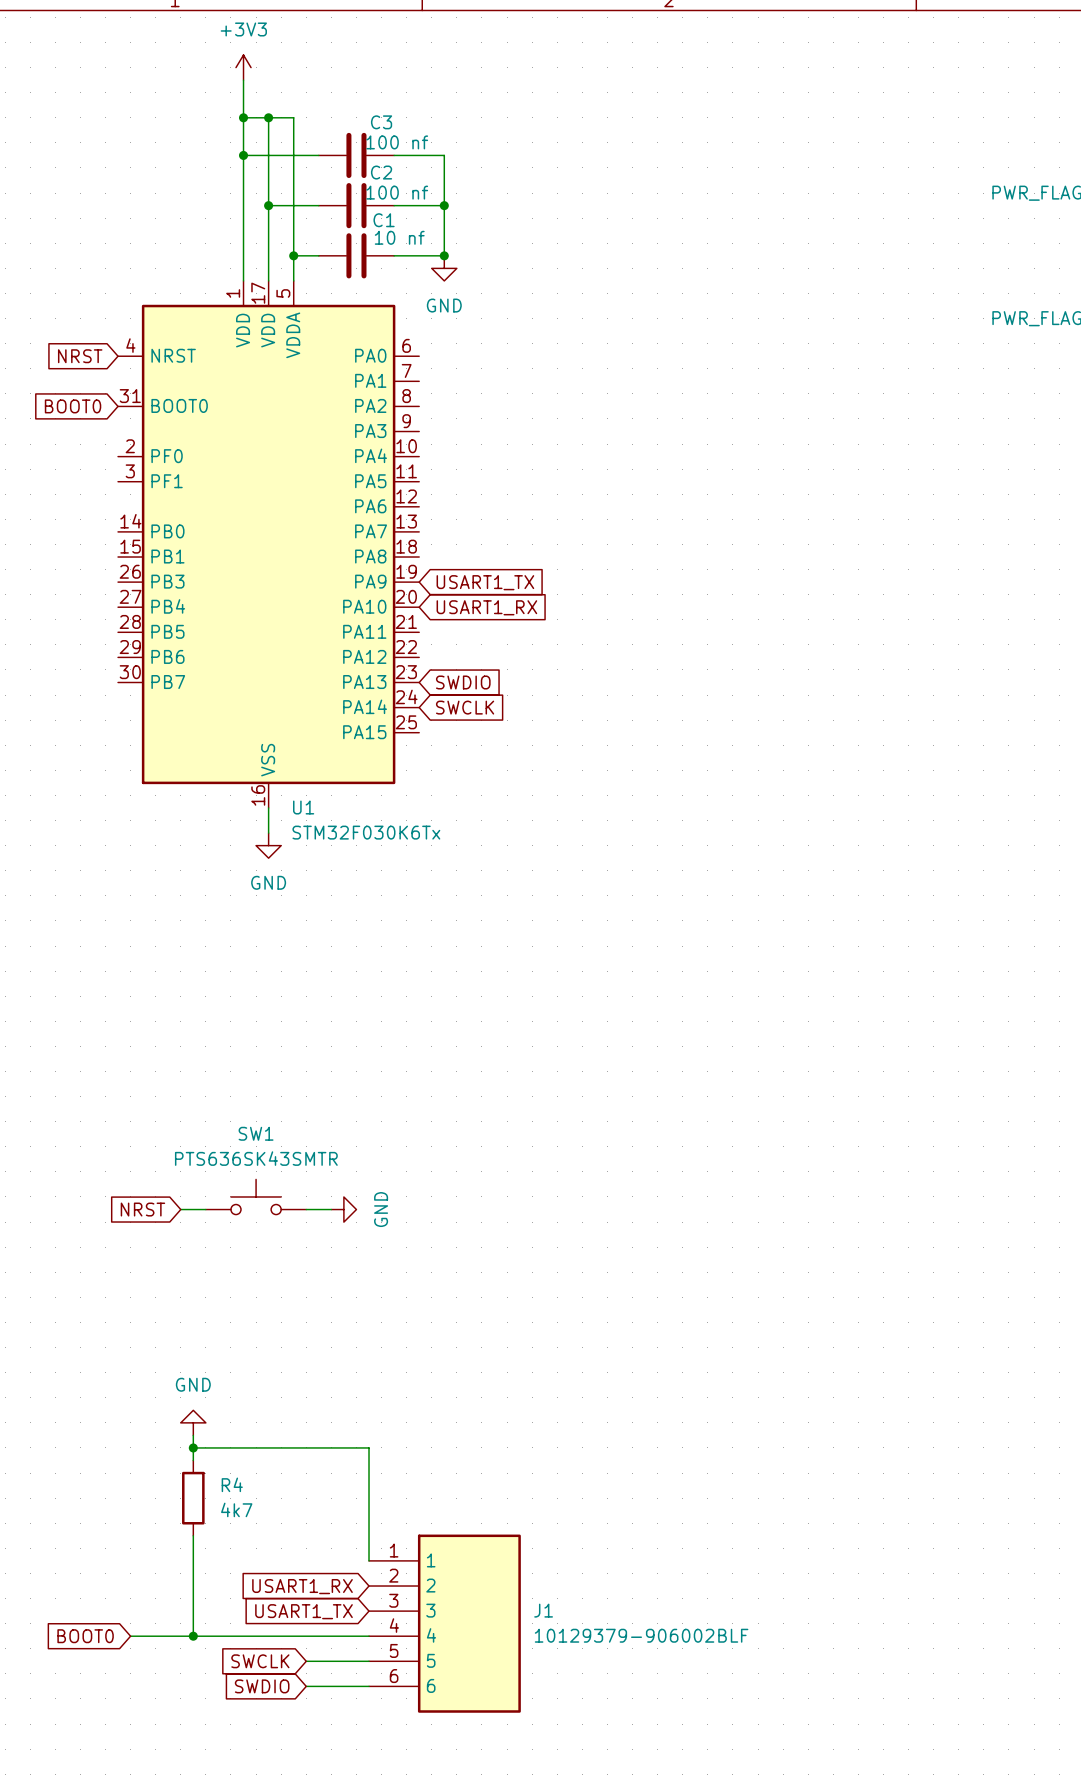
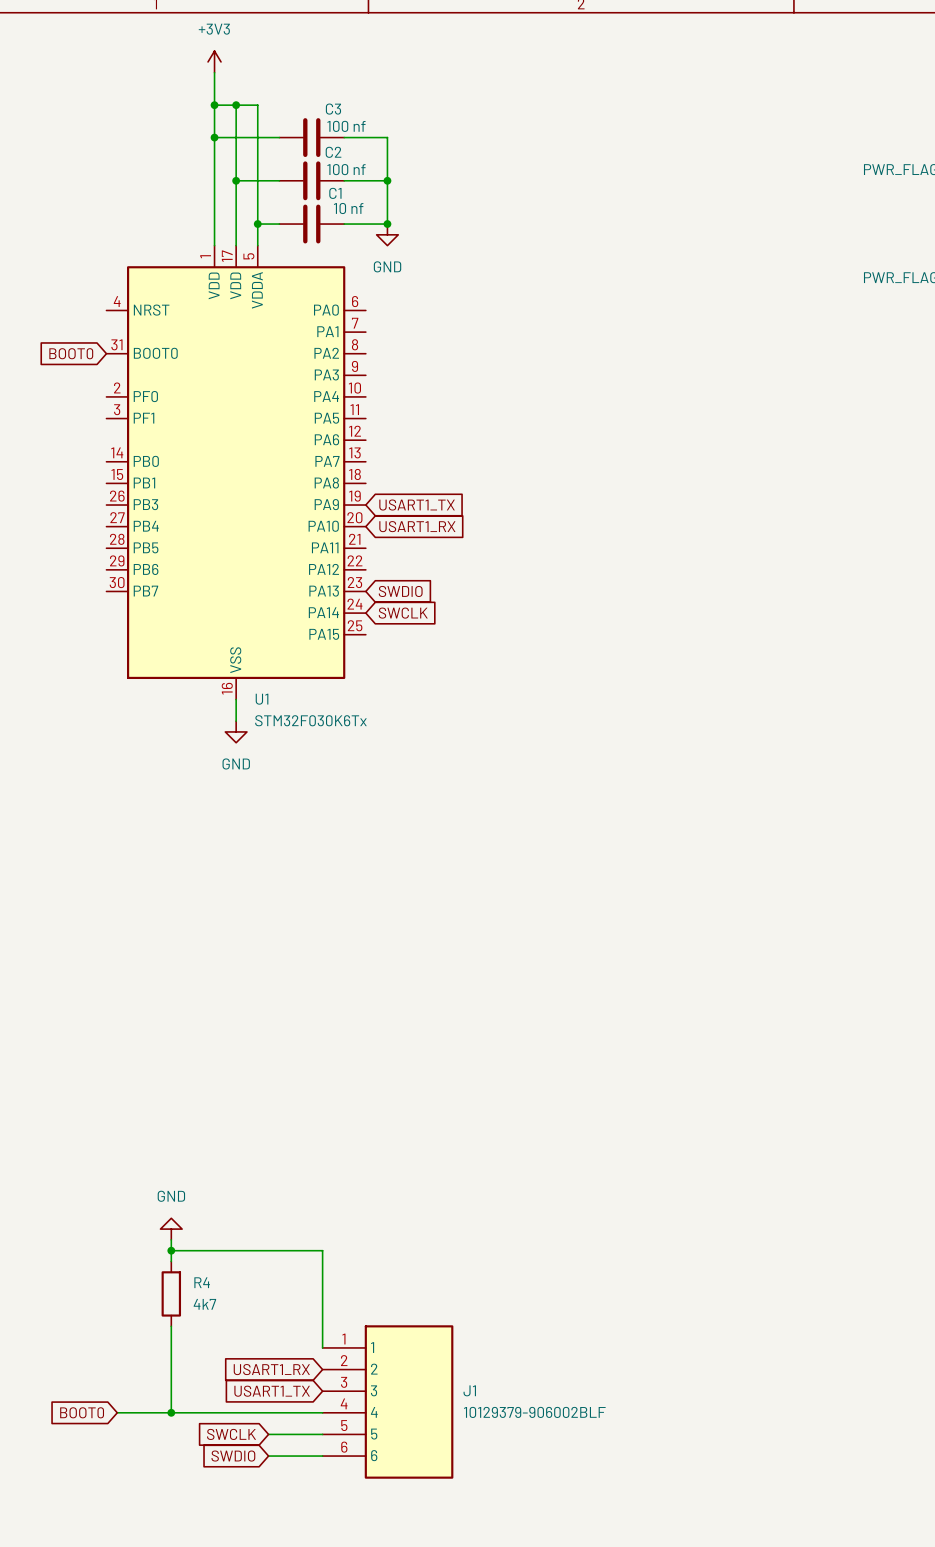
global label: NRST (80, 356) -> none
SW1: PTS636SK43SMTR (256, 1196) -> none
global label: NRST (142, 1209) -> none
wire: (180, 1209) (205, 1209) -> none
wire: (306, 1209) (331, 1209) -> none
power symbol: GND (343, 1209) -> none

